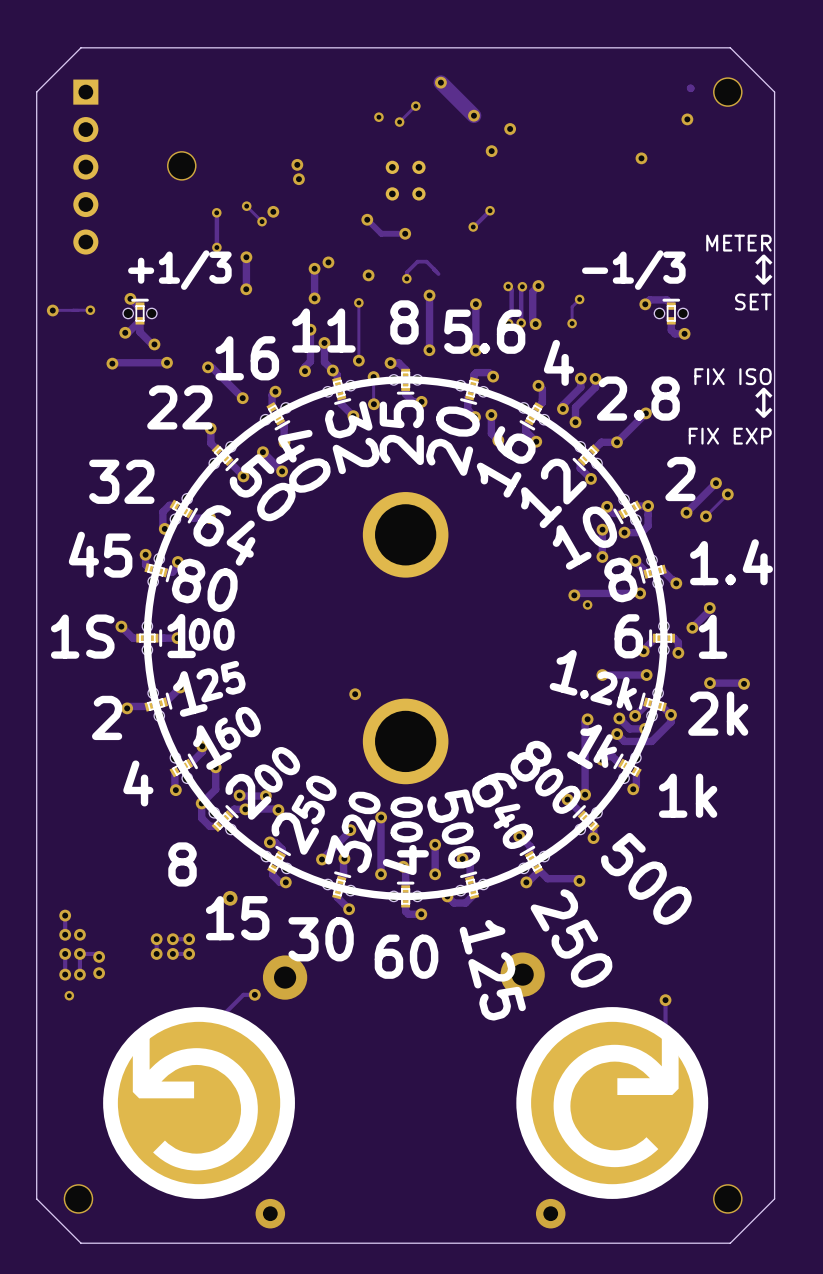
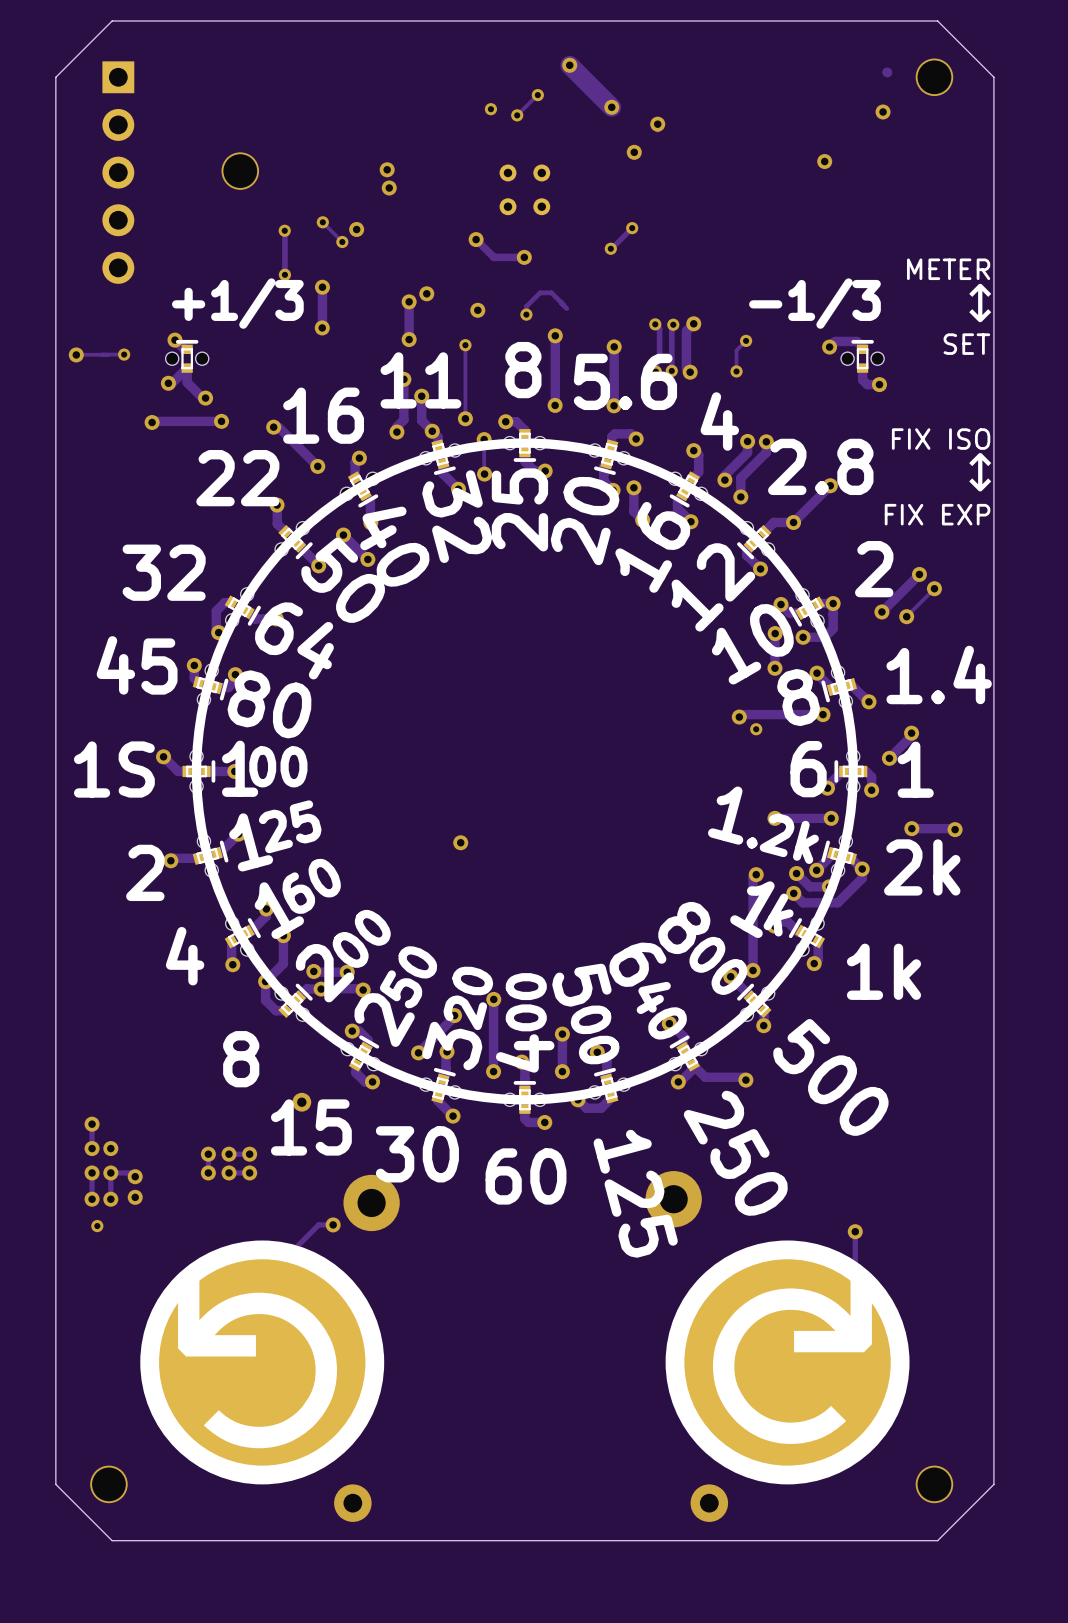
part: (405, 534) -> none
part: (405, 741) -> none

